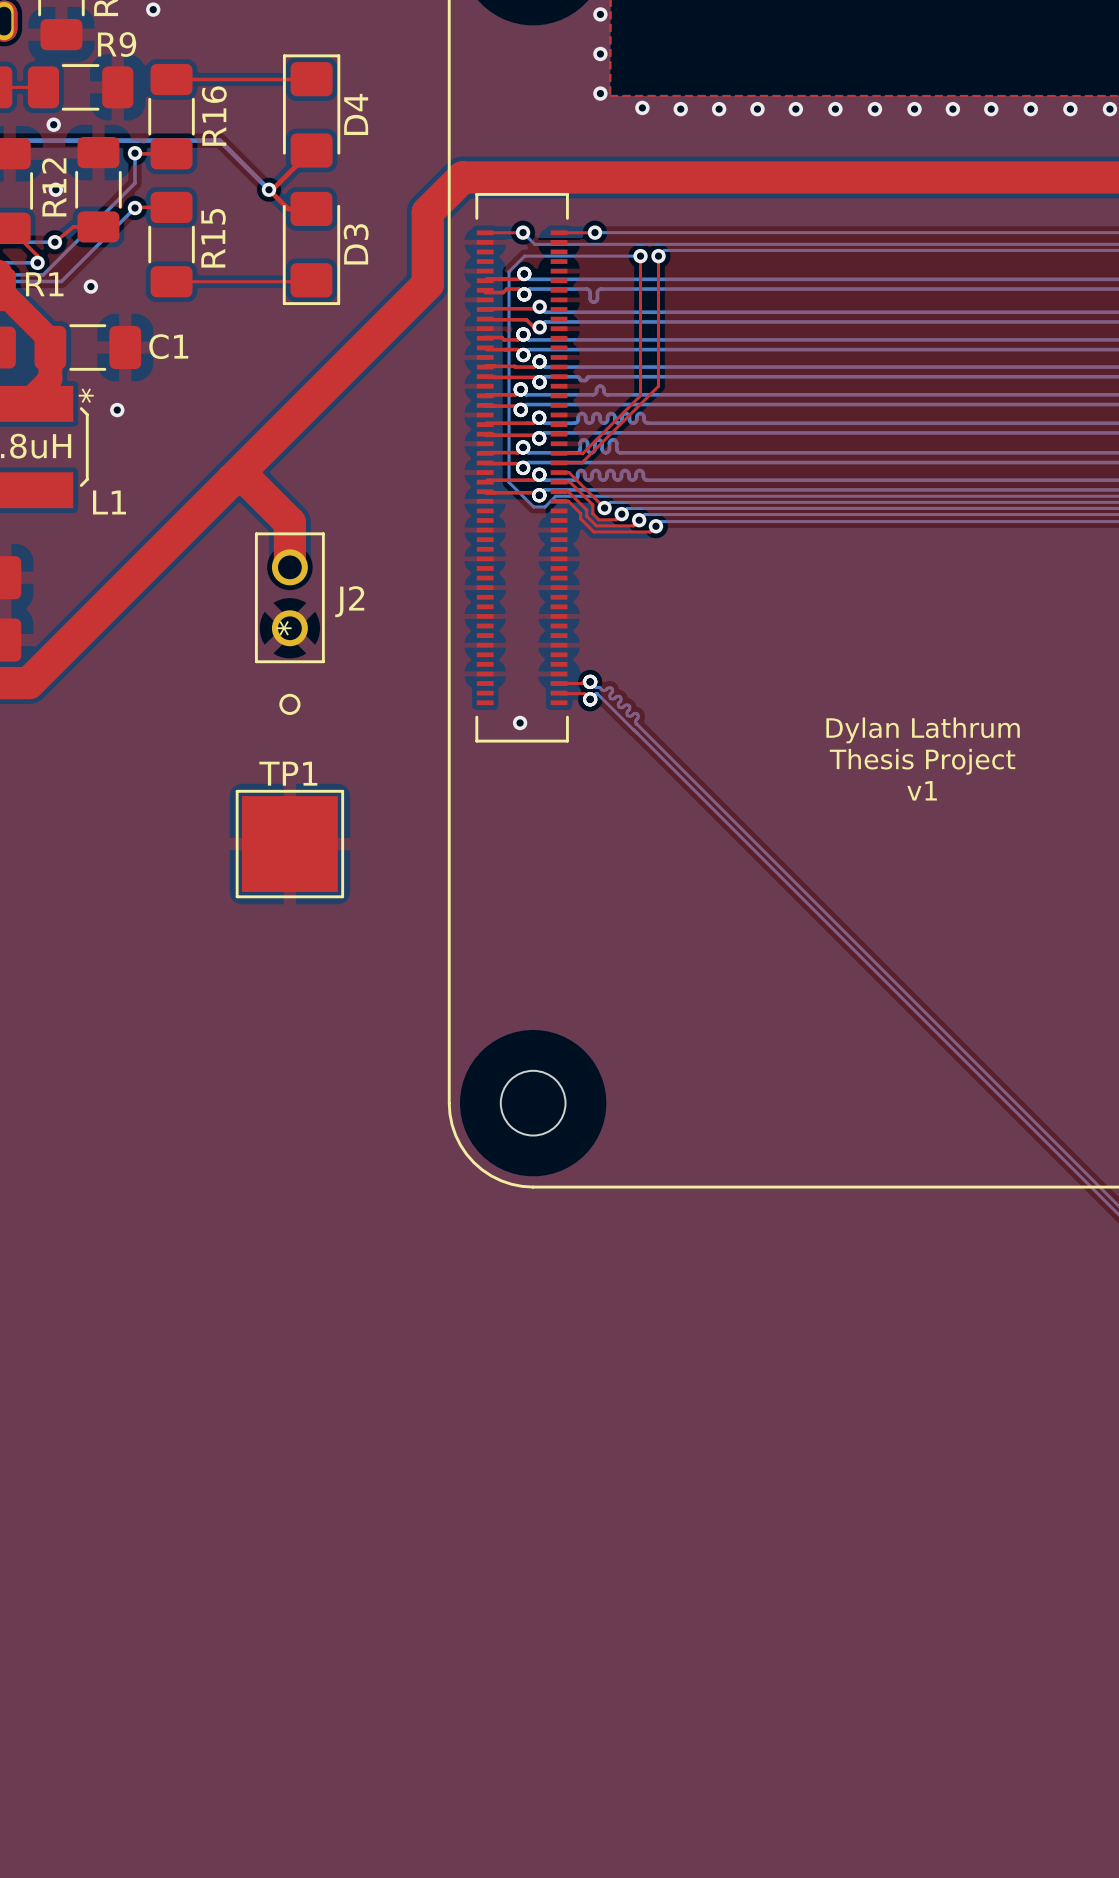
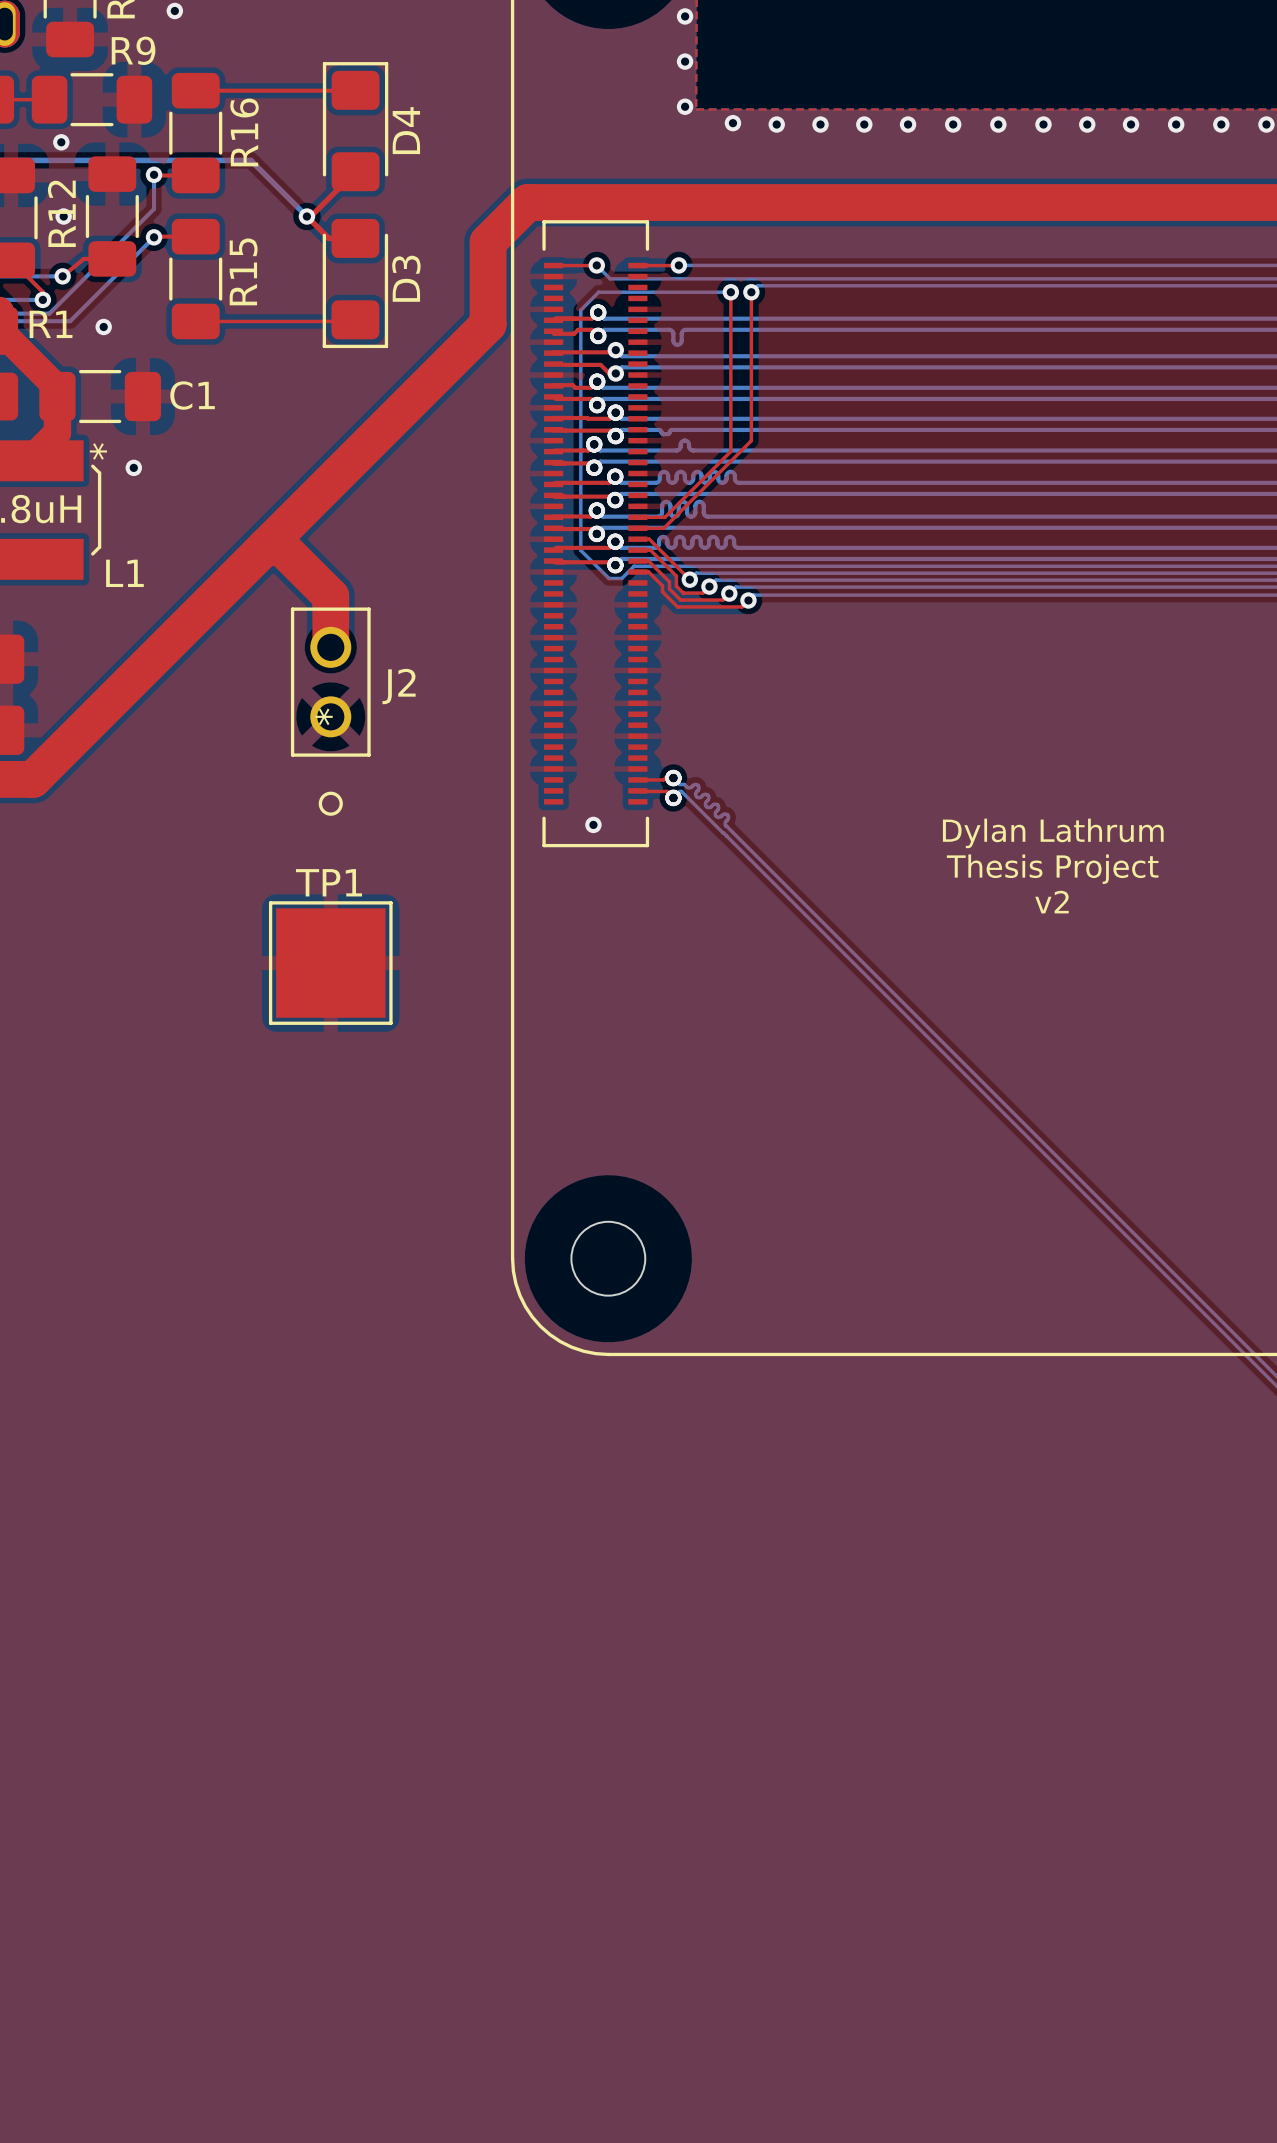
text: v1 (922, 790) -> v2 (1051, 902)

